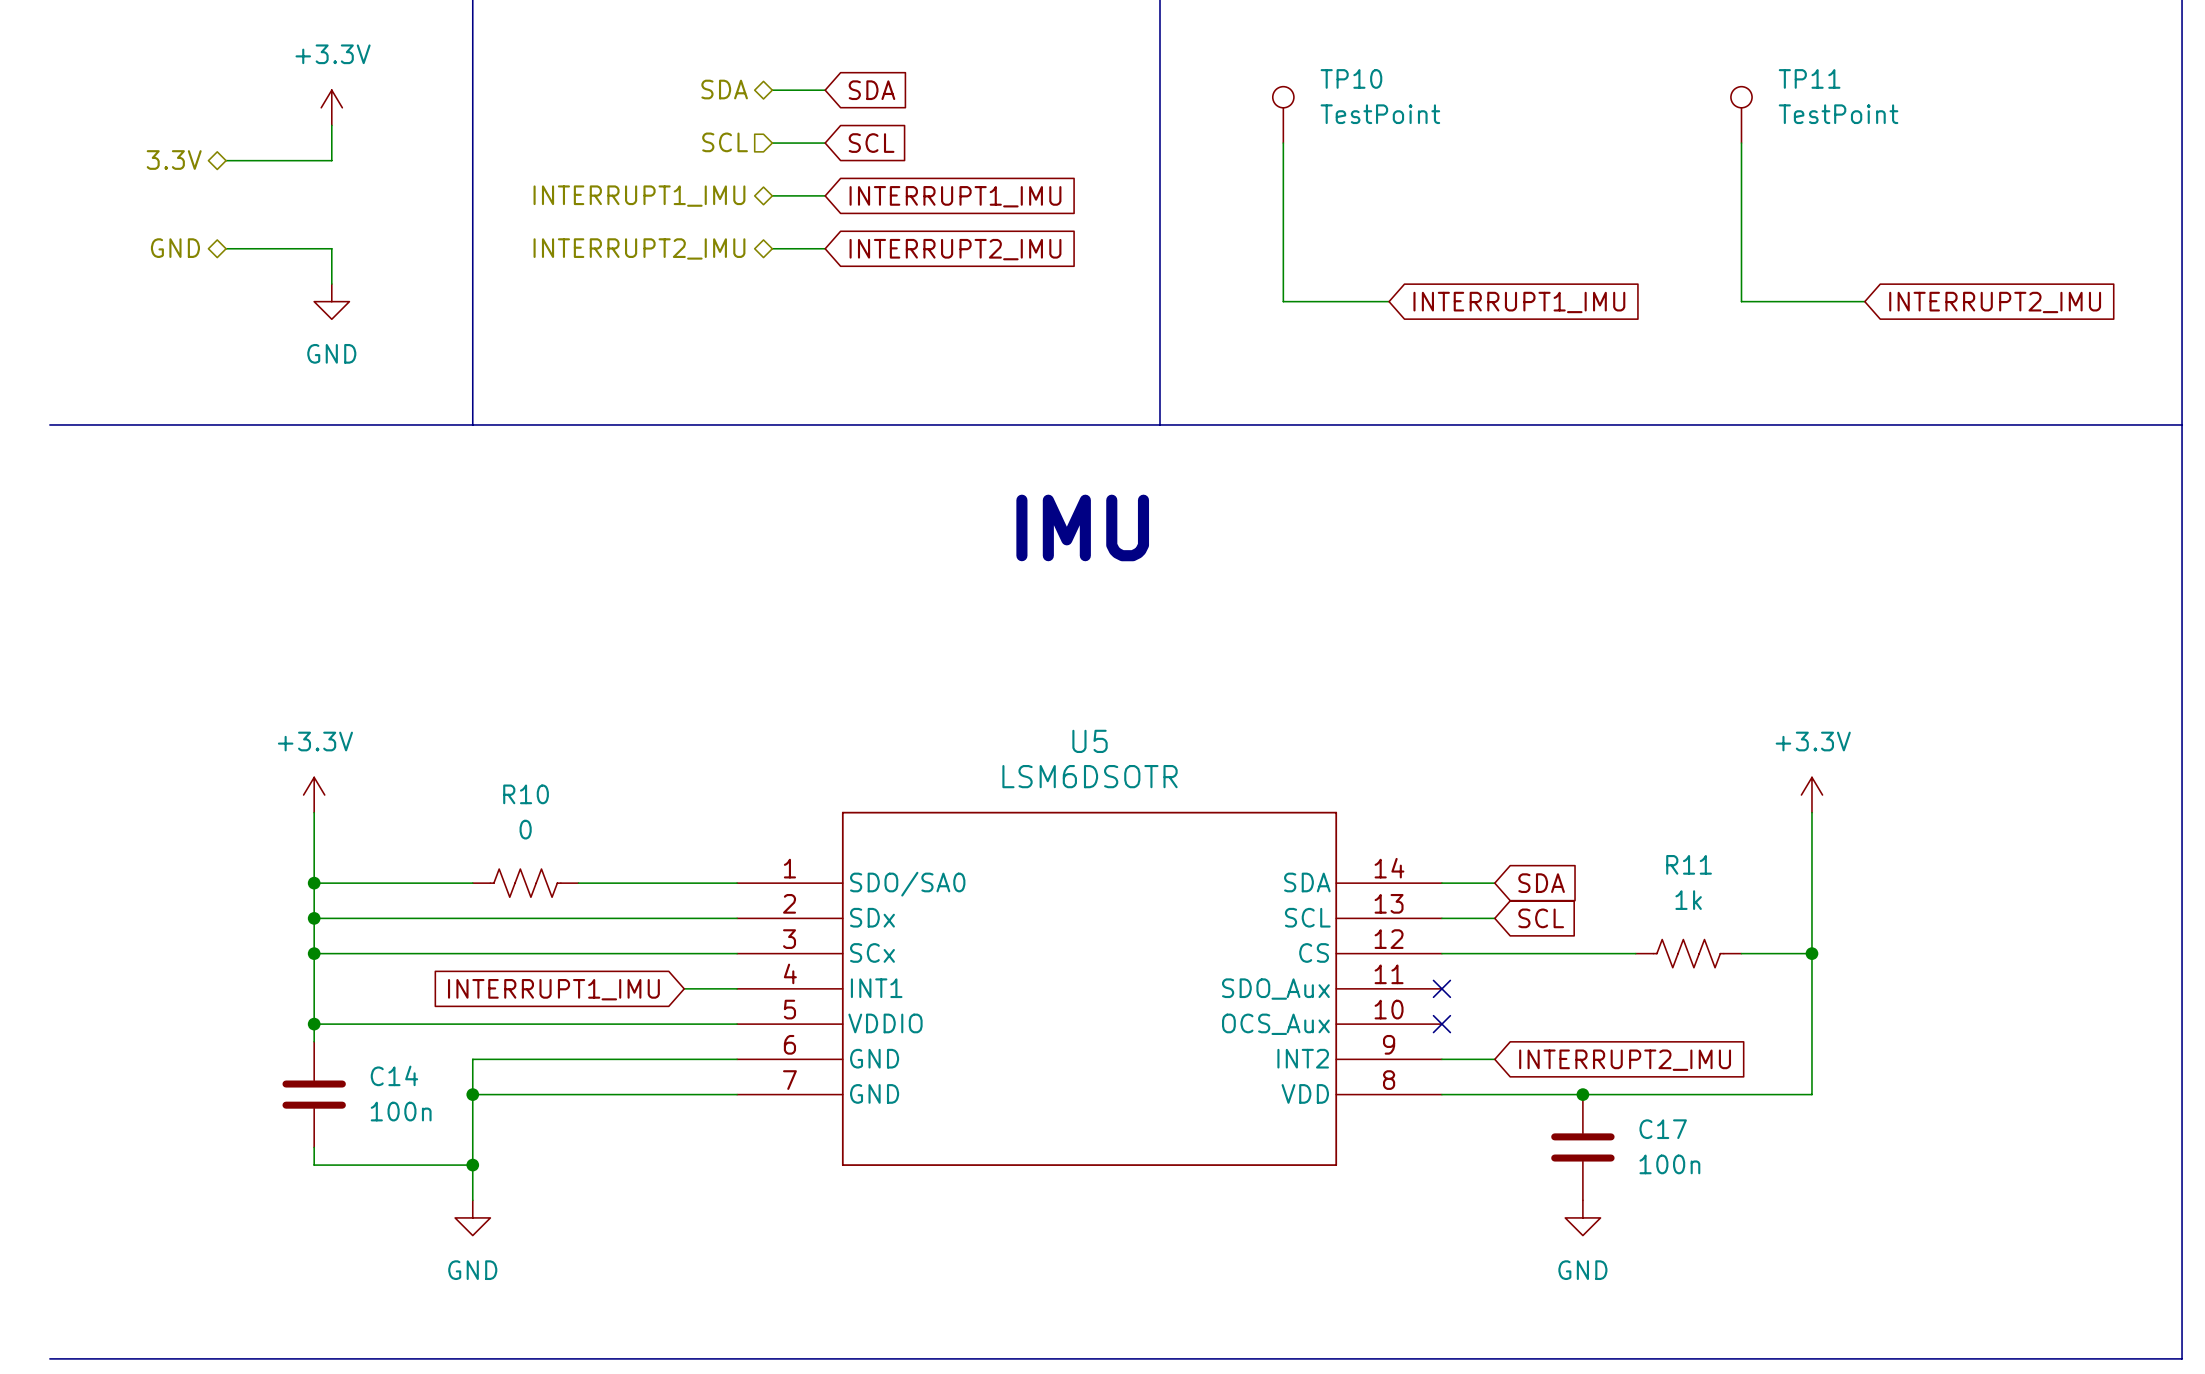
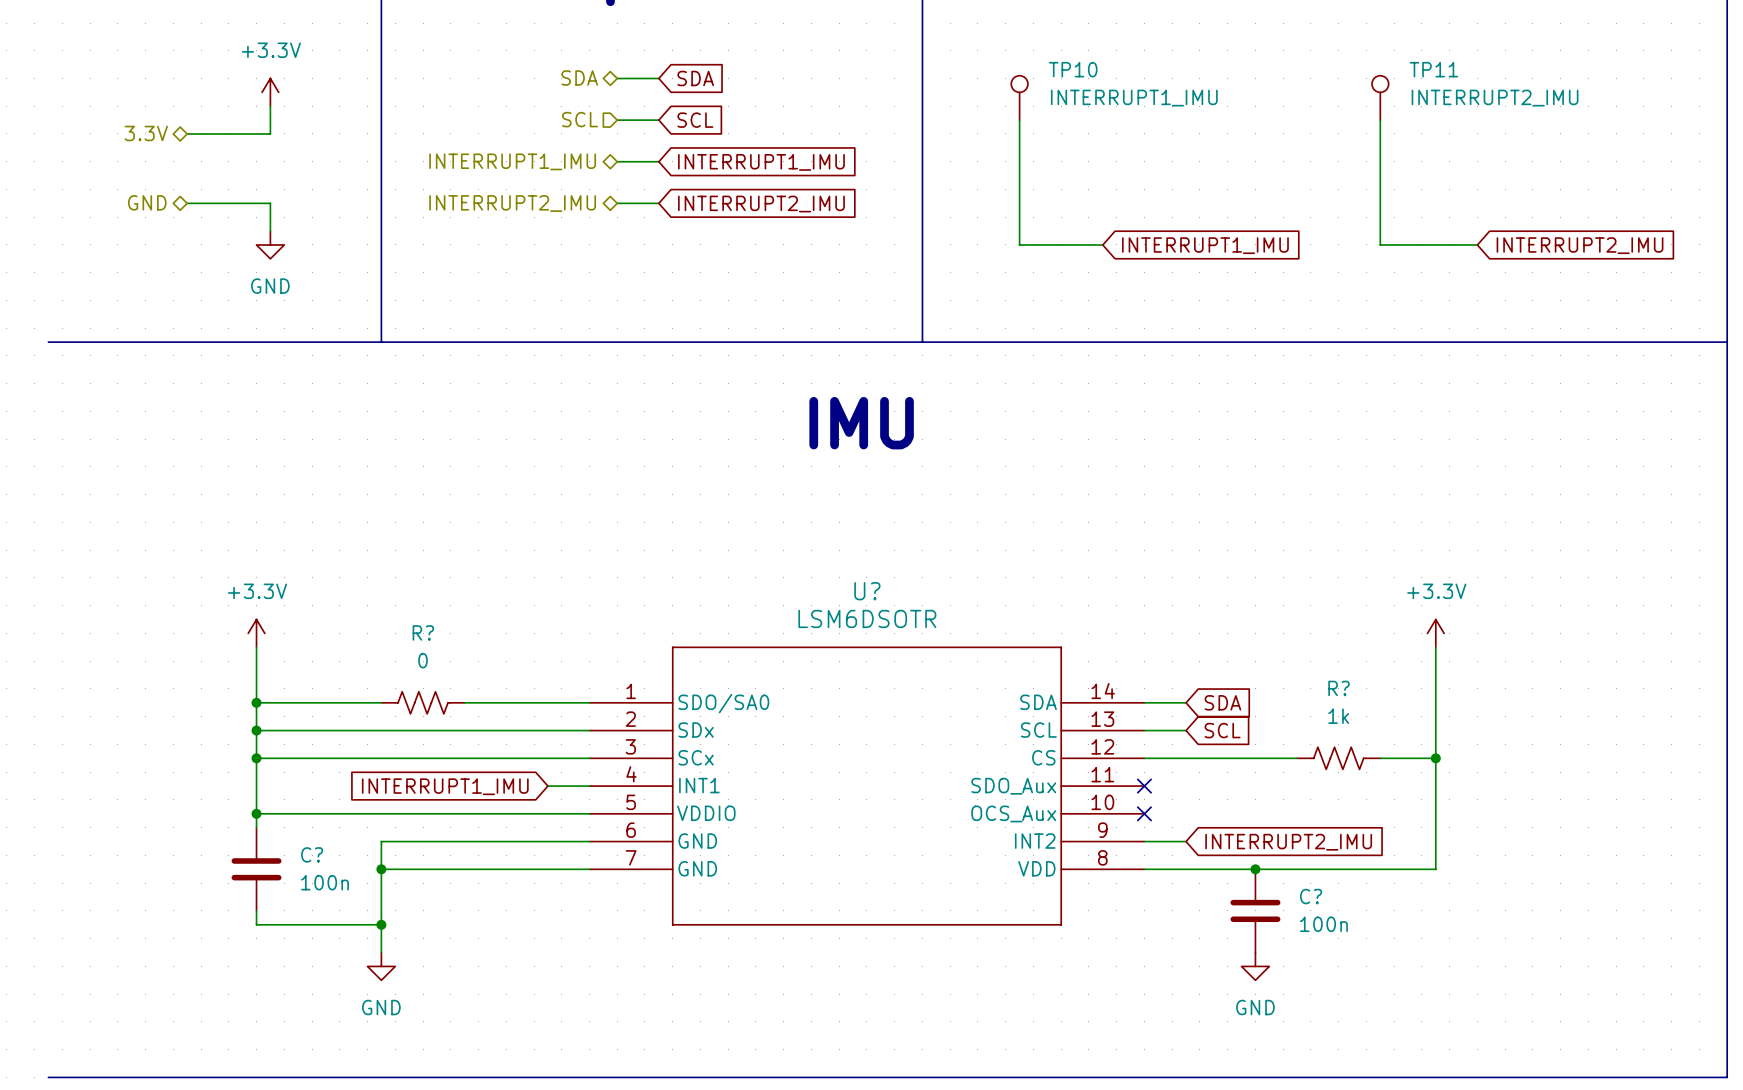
TP10 value: TestPoint (1380, 114) -> INTERRUPT1_IMU (1134, 98)
TP11 value: TestPoint (1838, 114) -> INTERRUPT2_IMU (1495, 98)
U5 name: U5 (1090, 741) -> U? (867, 591)
R10 name: R10 (526, 794) -> R? (423, 632)
R11 name: R11 (1689, 864) -> R? (1339, 688)
C14 name: C14 (394, 1075) -> C? (312, 854)
C17 name: C17 (1663, 1129) -> C? (1311, 896)

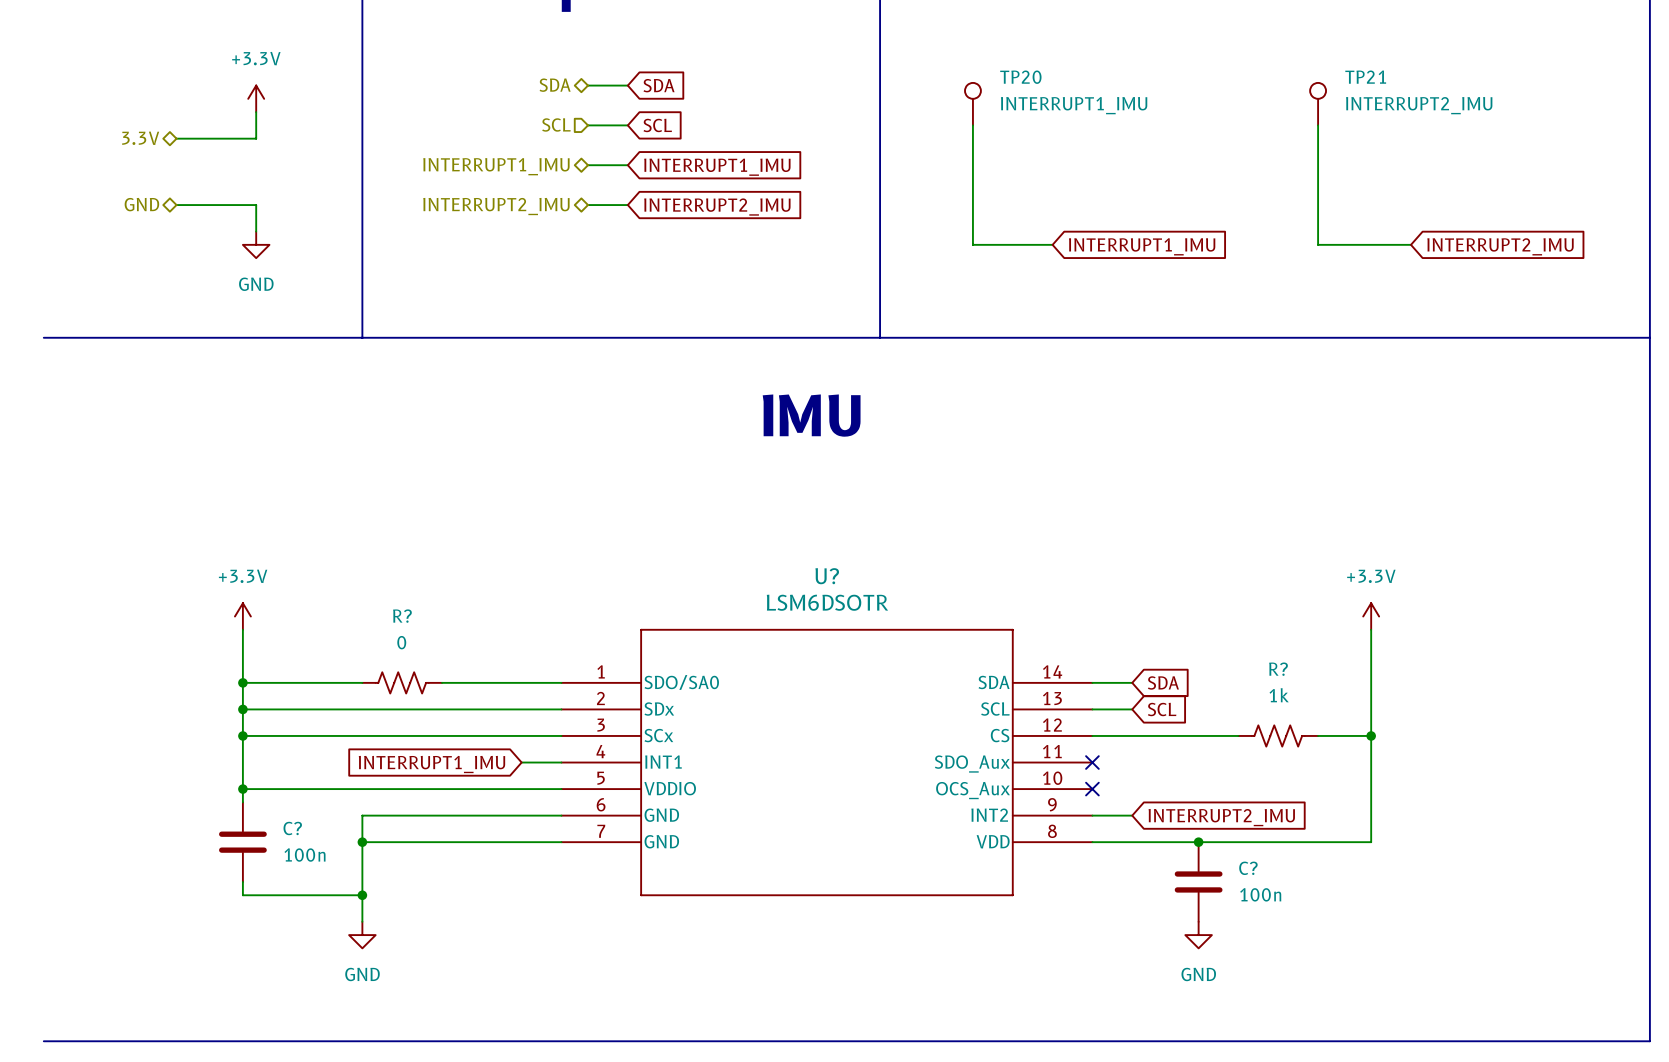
TP10 name: TP10 (1073, 69) -> TP20 (1020, 77)
TP11 name: TP11 (1433, 69) -> TP21 (1365, 77)

